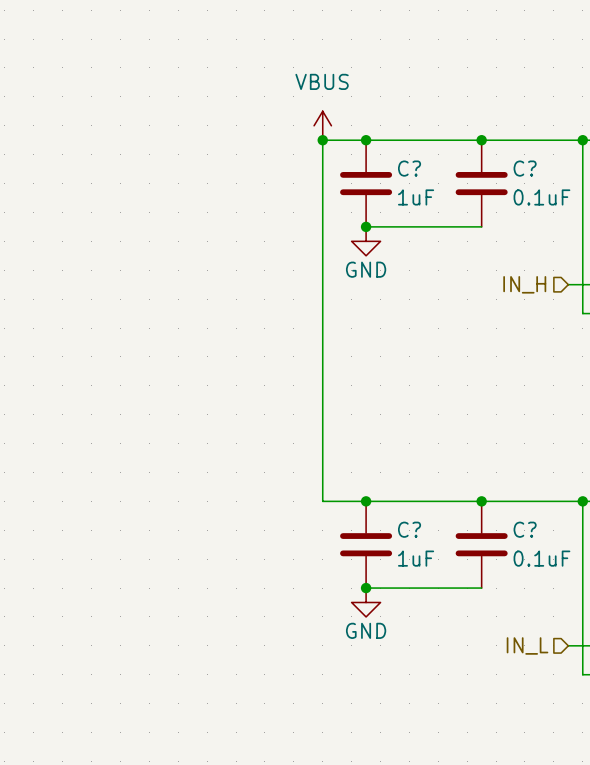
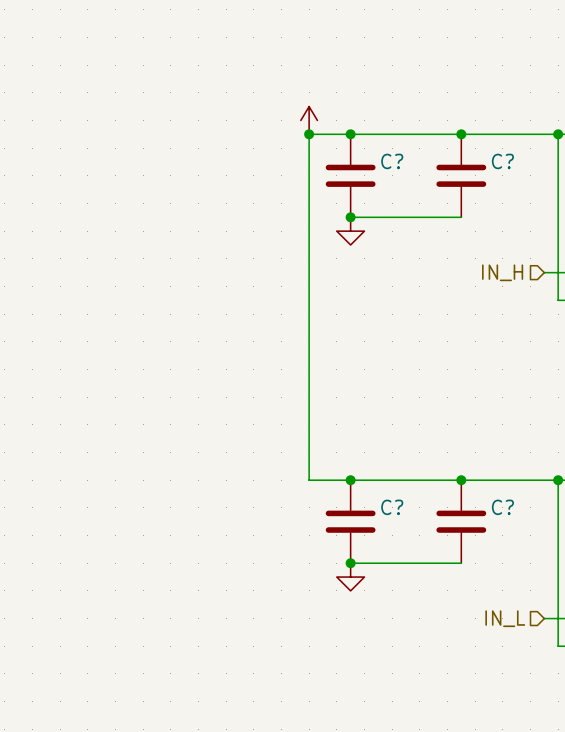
power symbol text: VBUS (322, 81) -> none
C? value: 1uF (416, 197) -> none
C? value: 0.1uF (541, 197) -> none
power symbol text: GND (366, 269) -> none
C? value: 1uF (416, 558) -> none
C? value: 0.1uF (541, 558) -> none
power symbol text: GND (366, 630) -> none

